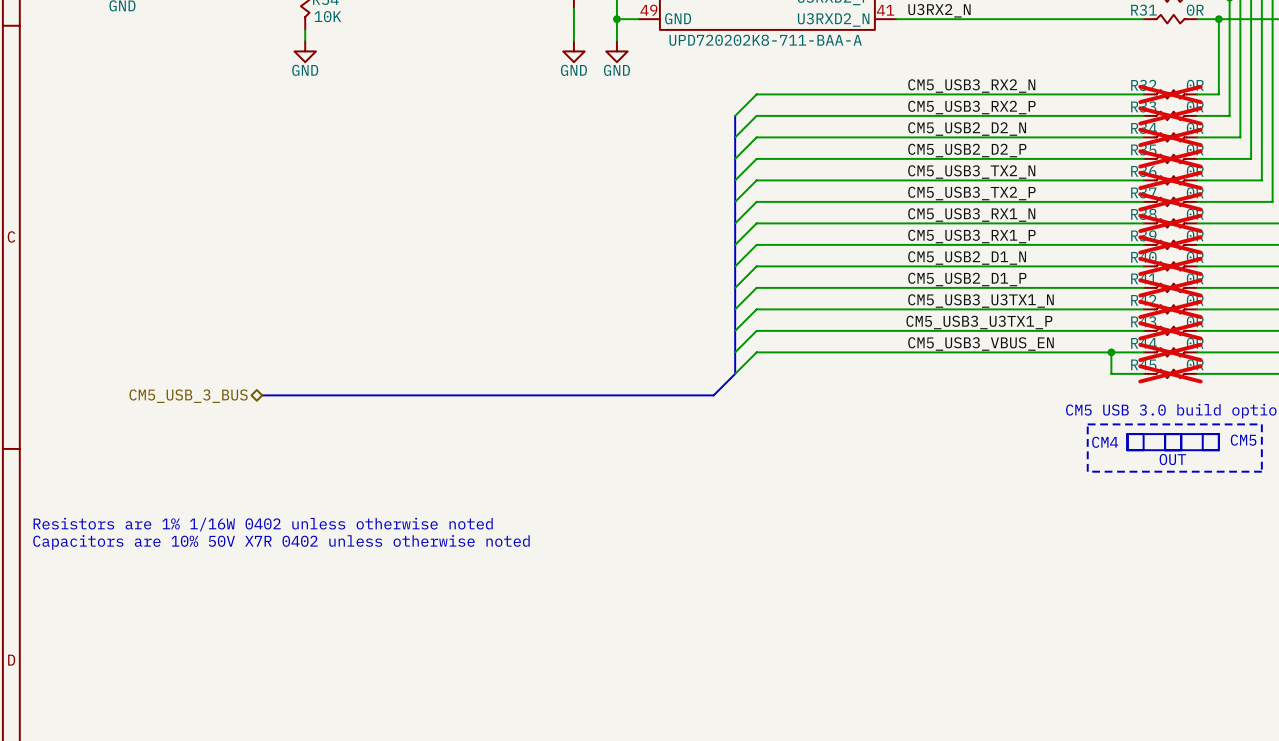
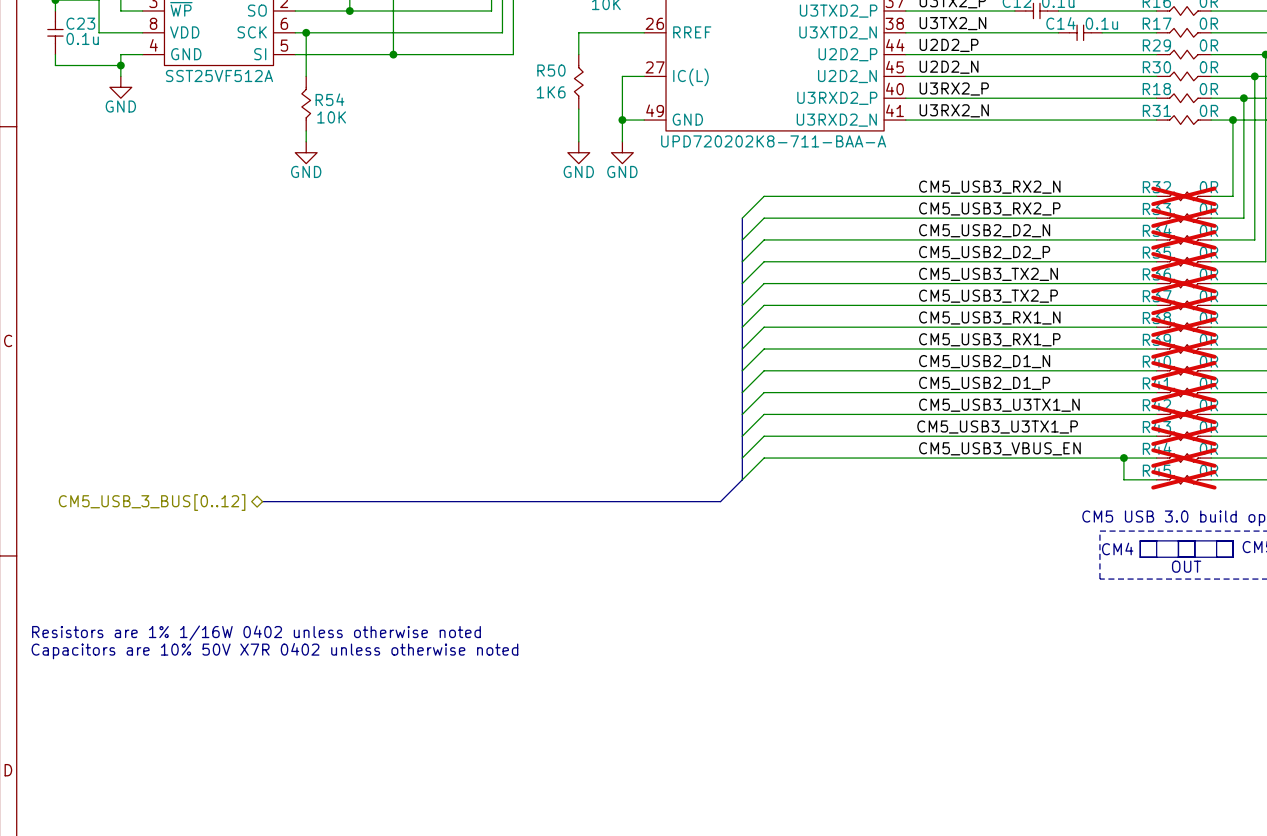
hierarchical label: CM5_USB_3_BUS (188, 396) -> CM5_USB_3_BUS[0..12] (152, 502)

